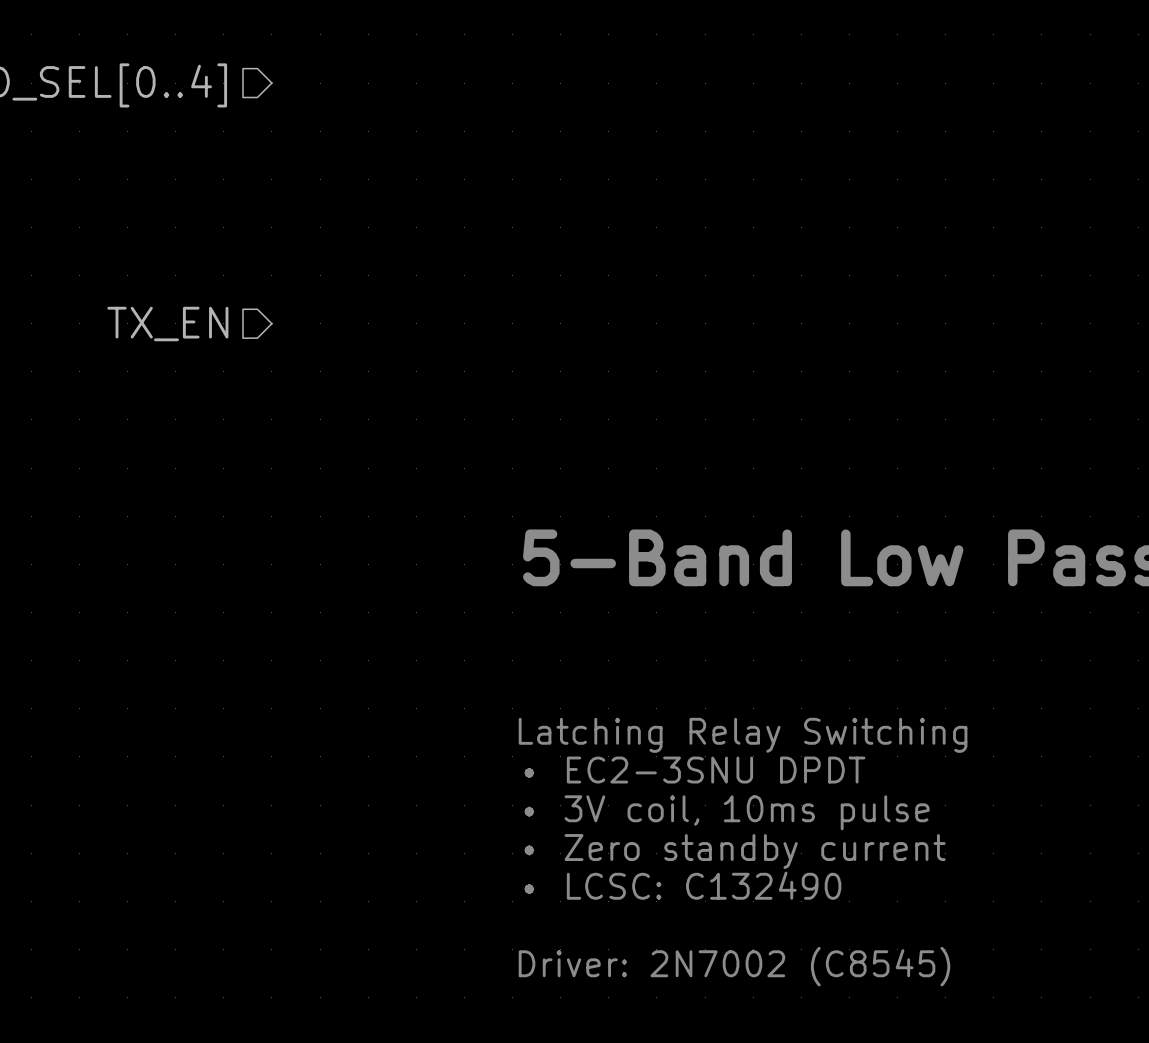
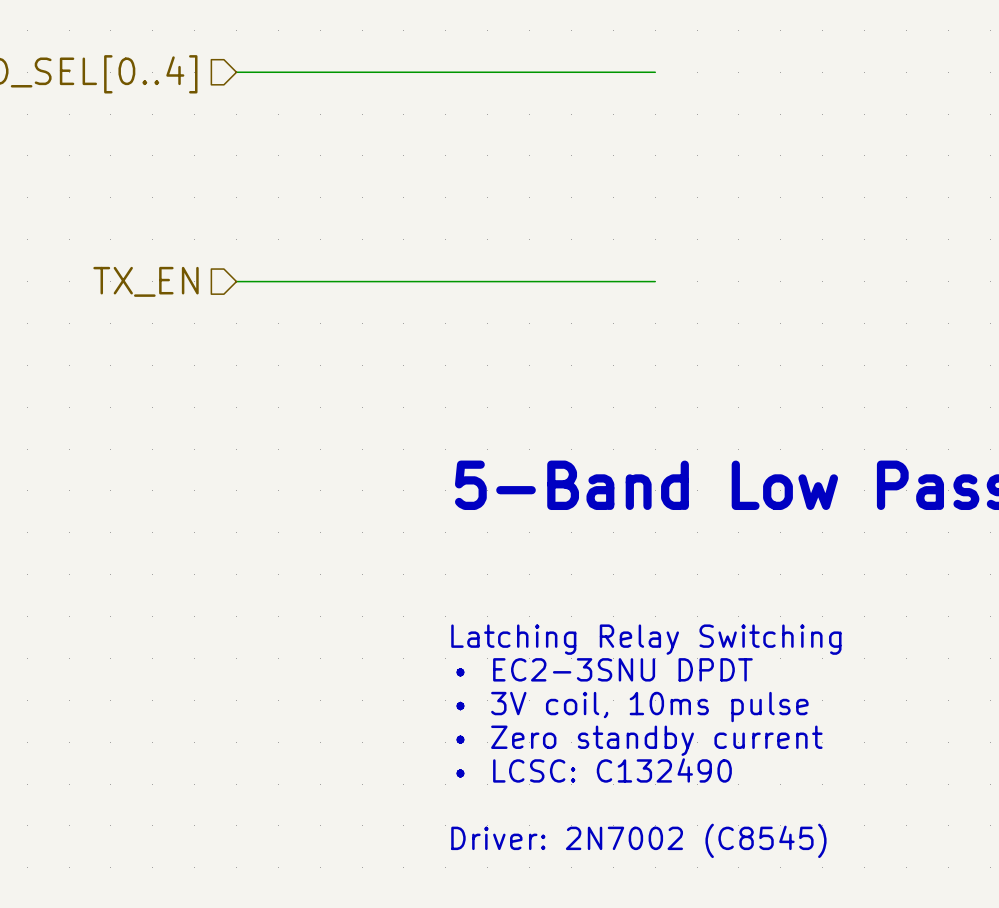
wire: none -> (236, 72) (655, 72)
wire: none -> (236, 281) (655, 281)

